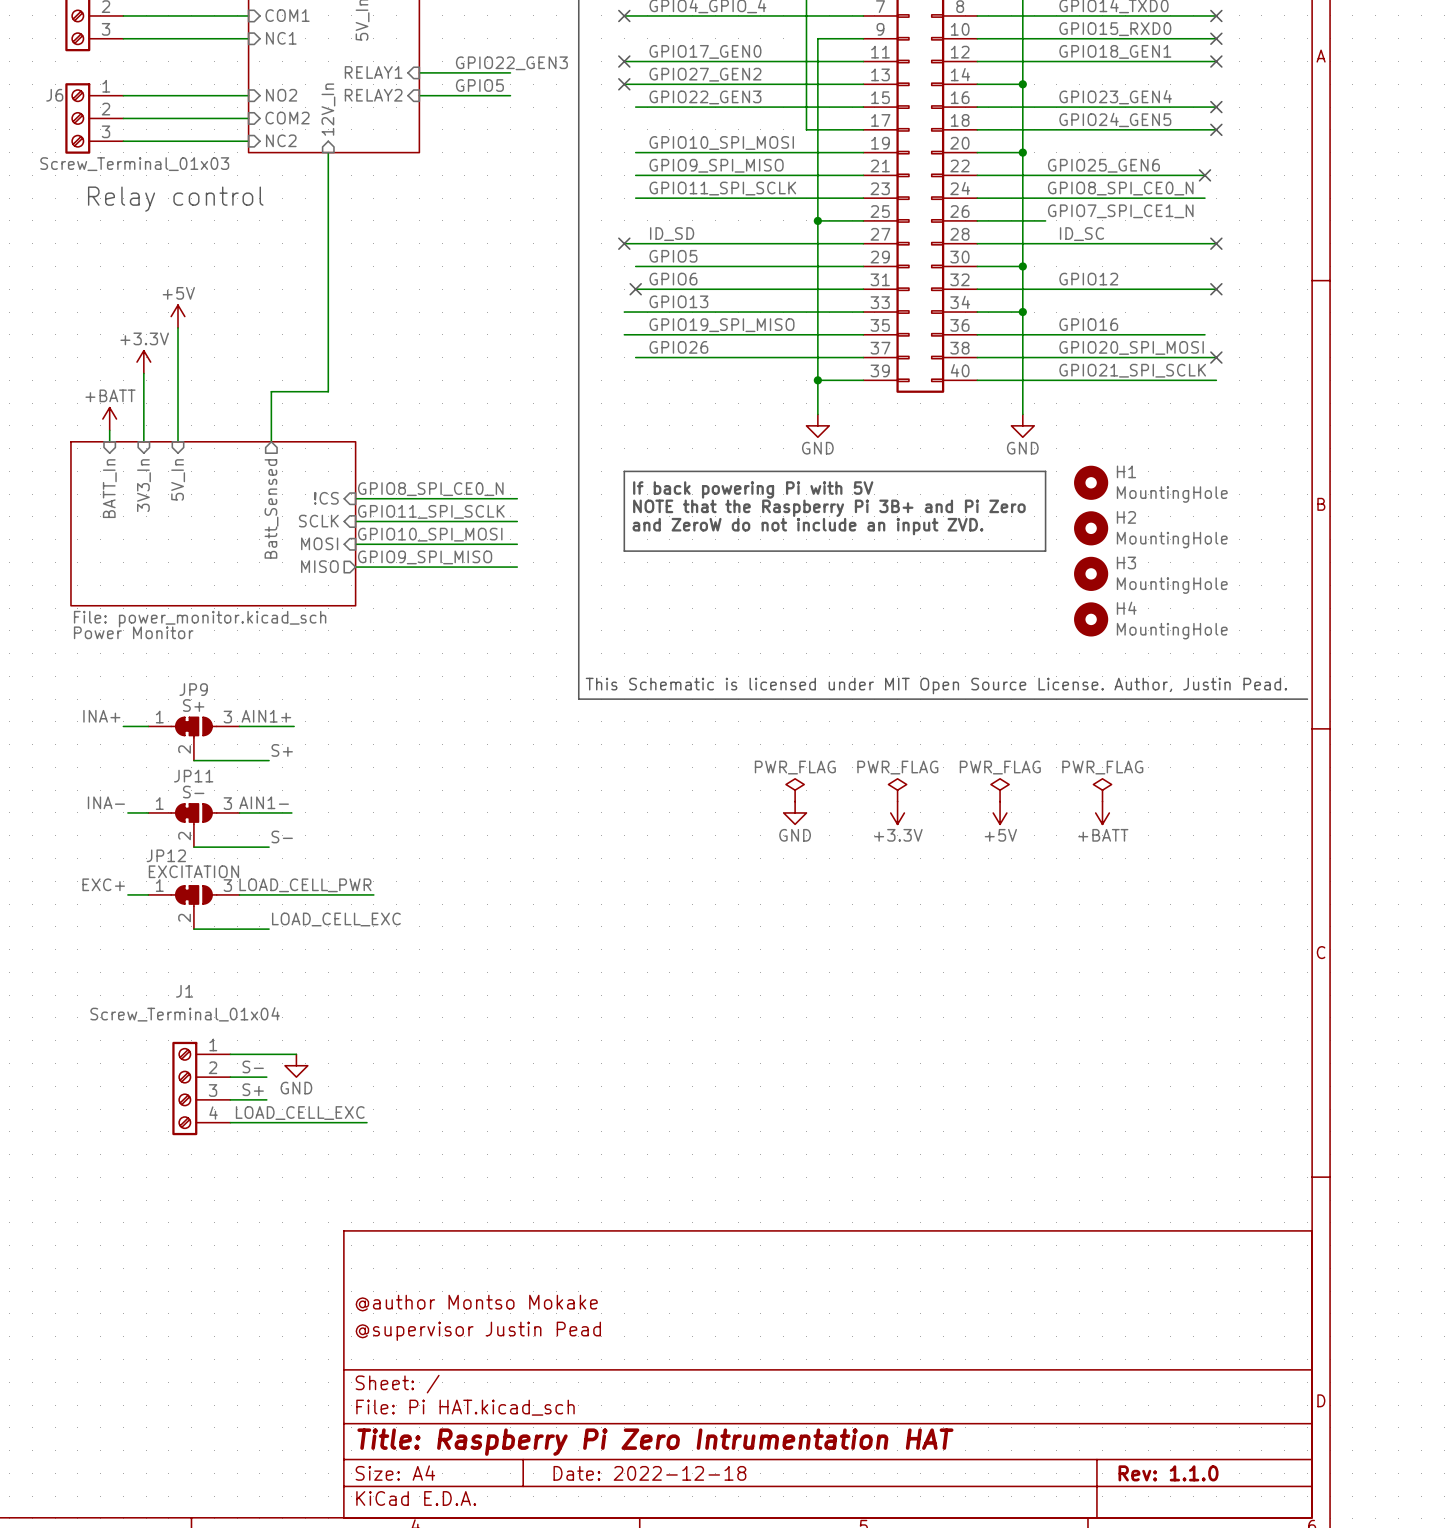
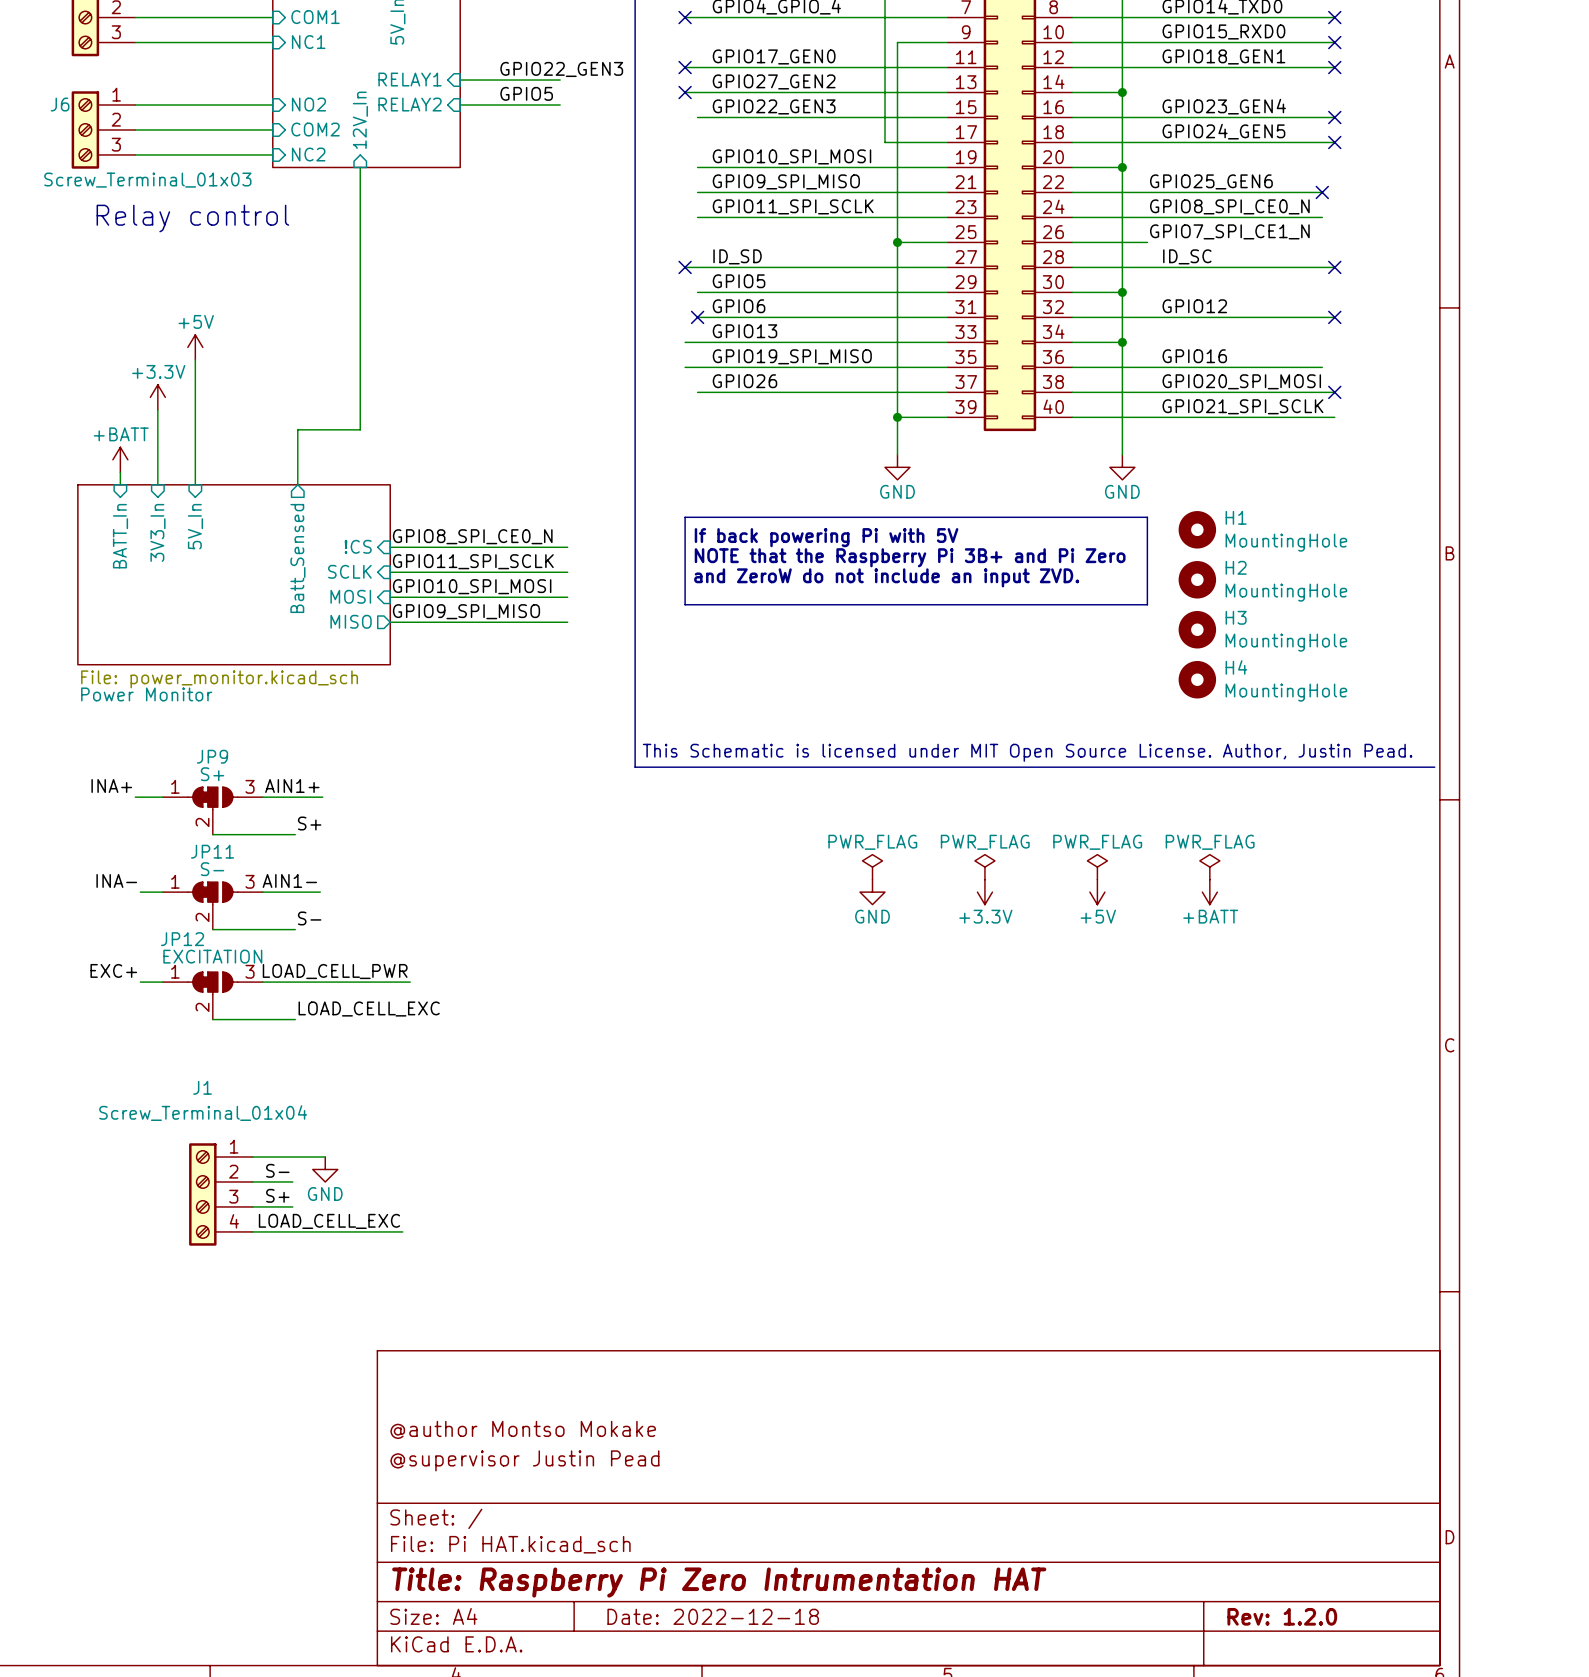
title block: Rev: 1.1.0 (1168, 1473) -> Rev: 1.2.0 (1282, 1616)

